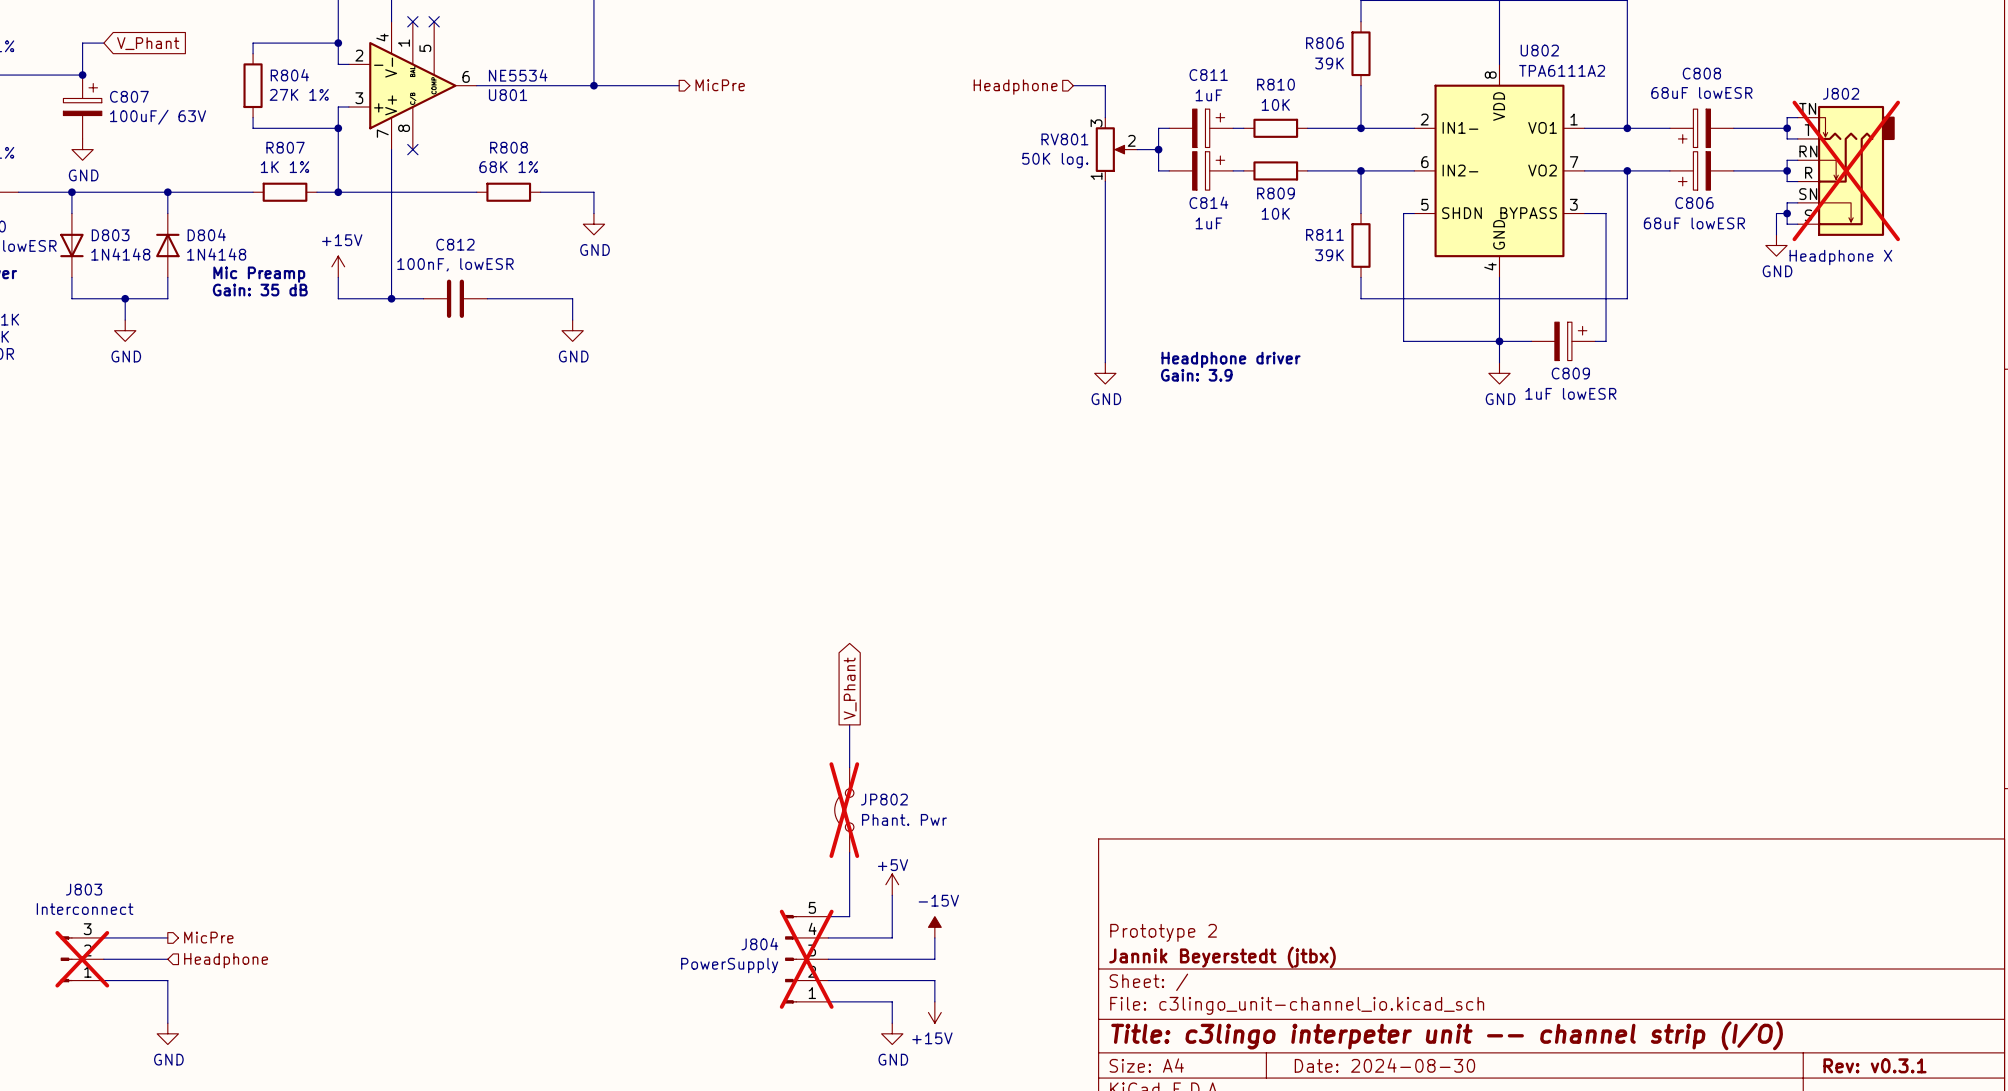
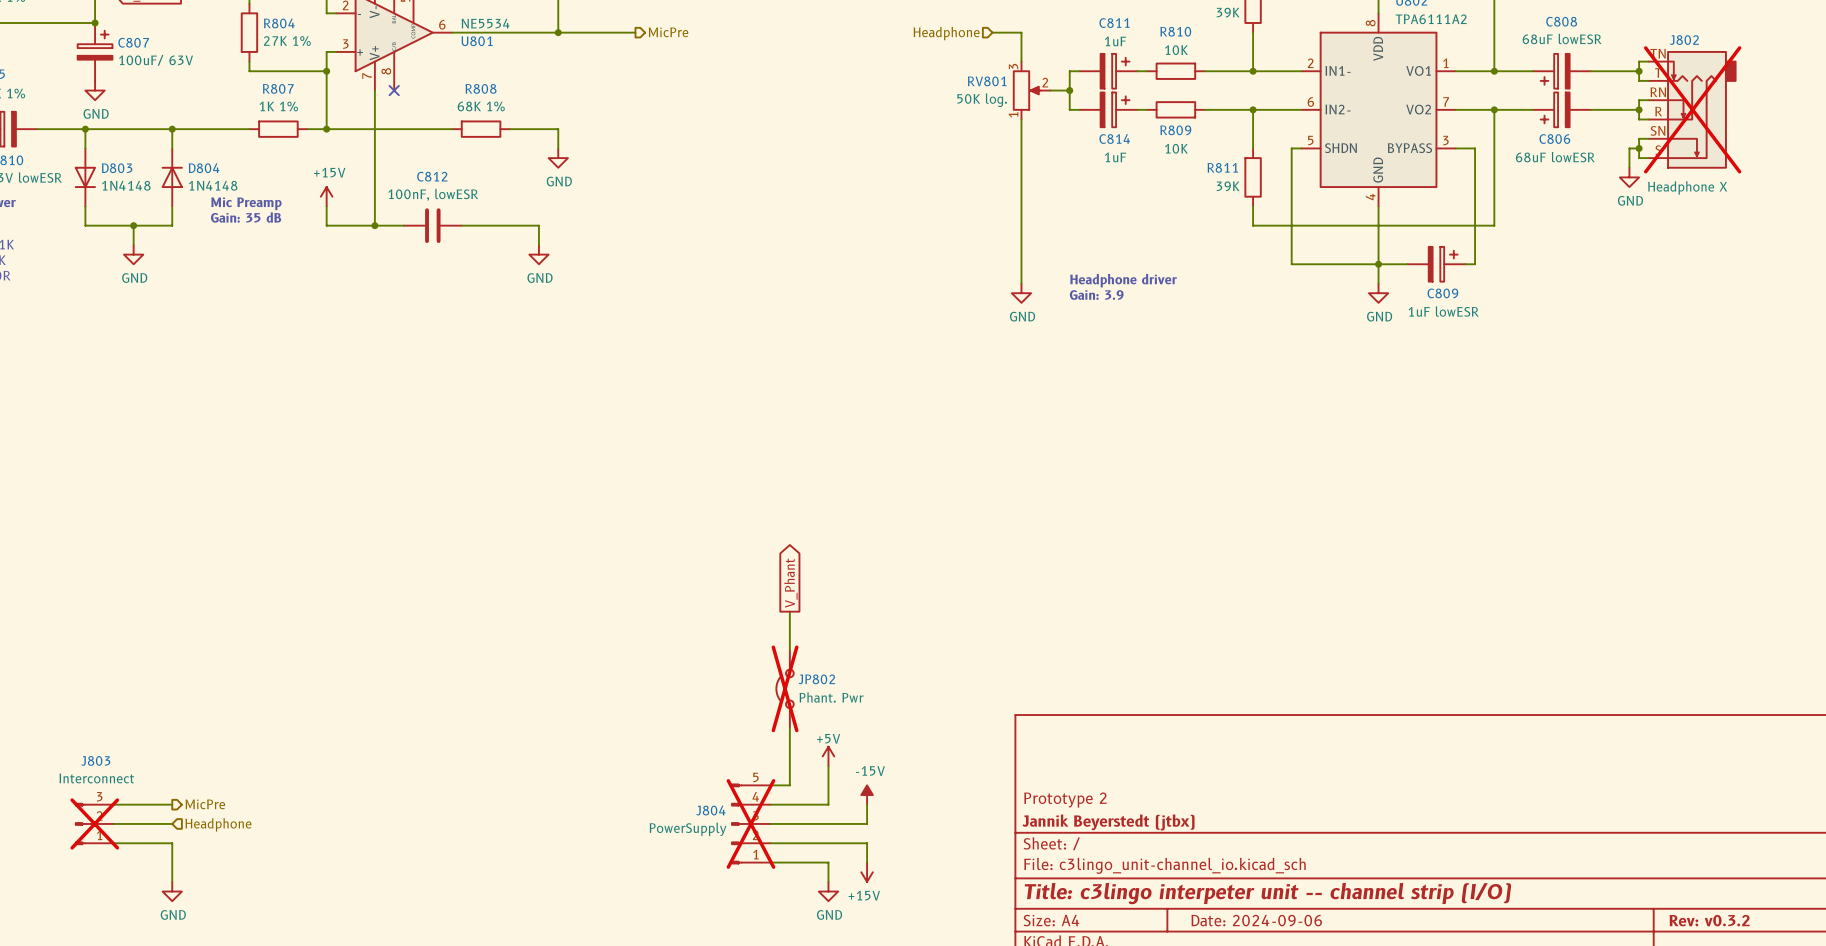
title block: Date: 2024-08-30 (1384, 1065) -> Date: 2024-09-06 (1256, 920)
title block: Rev: v0.3.1 (1874, 1065) -> Rev: v0.3.2 (1709, 920)

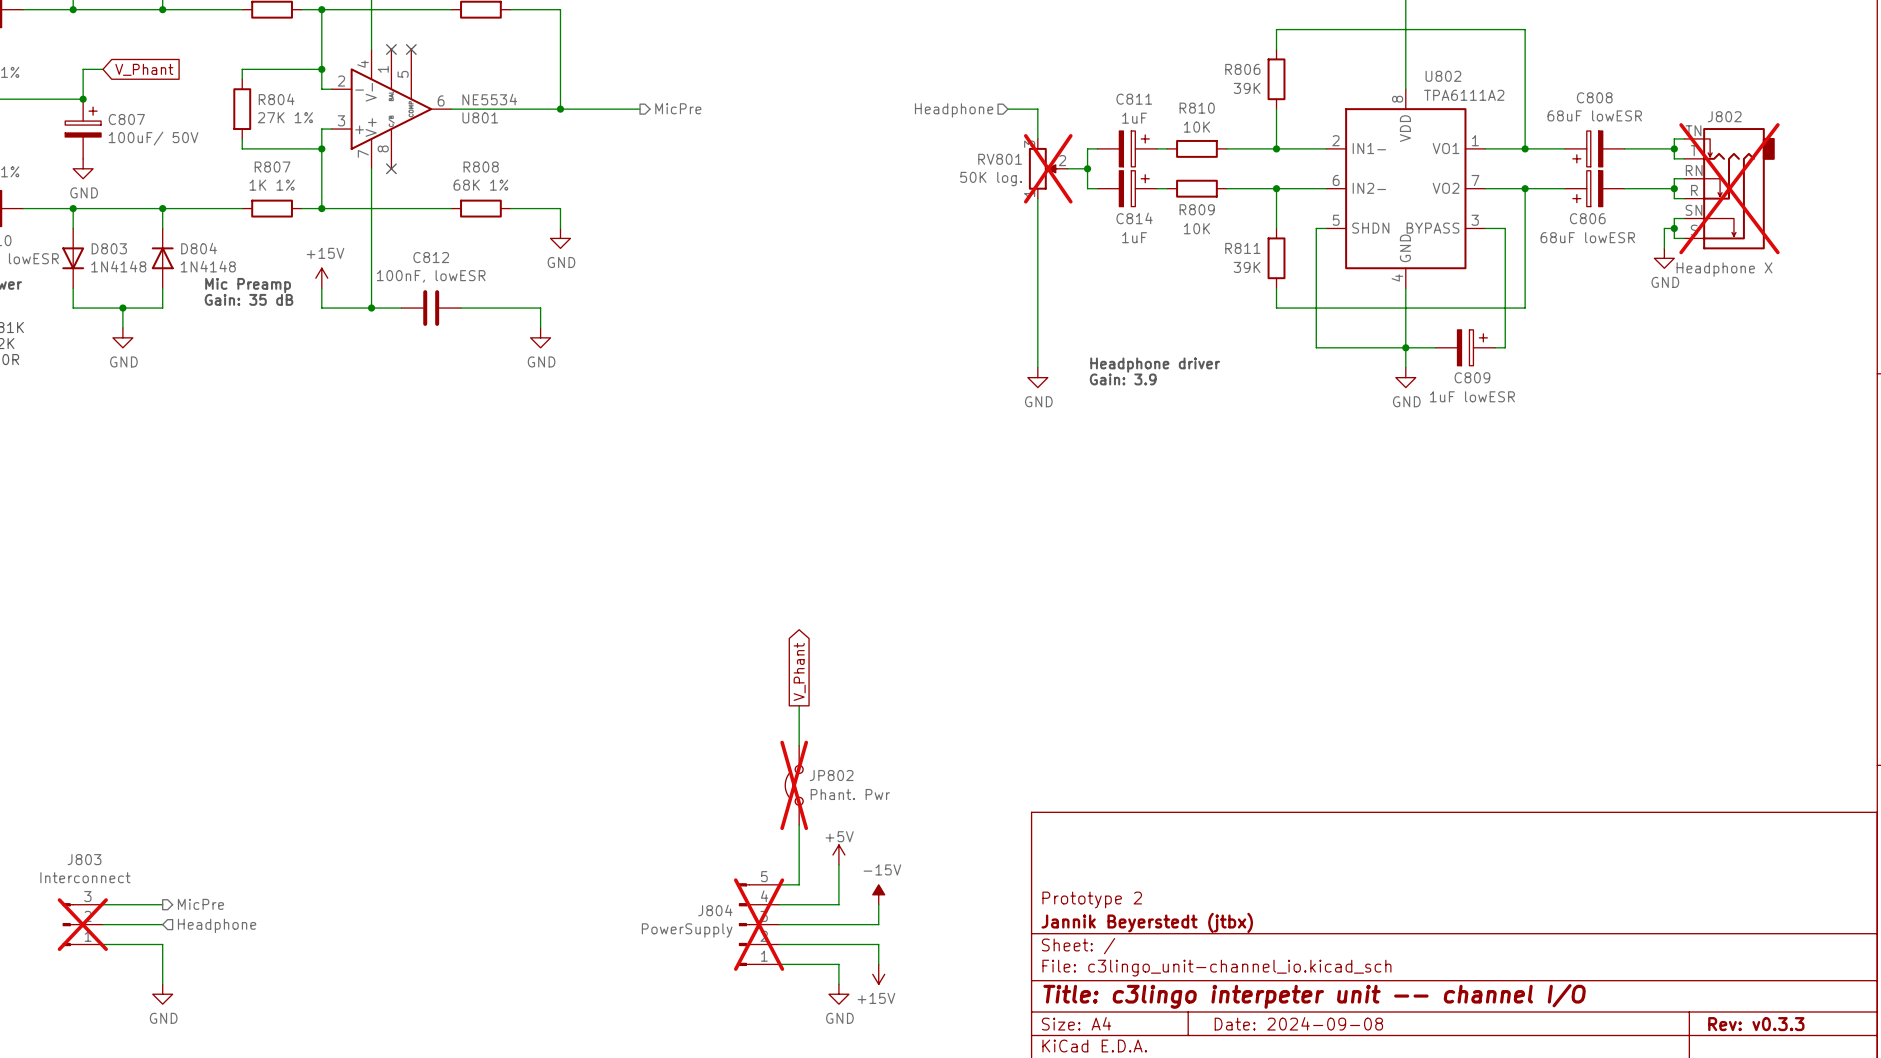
C807 value: 100uF/ 63V (156, 60) -> 100uF/ 50V (153, 138)
RV801 do-not-place cross: none -> (1048, 168)
title block: Title: c3lingo interpeter unit -- channel strip (I/O) (1267, 893) -> Title: c3lingo interpeter unit -- channel I/O (1314, 996)
title block: Date: 2024-09-06 (1256, 920) -> Date: 2024-09-08 (1298, 1023)
title block: Rev: v0.3.2 (1709, 920) -> Rev: v0.3.3 (1756, 1024)

